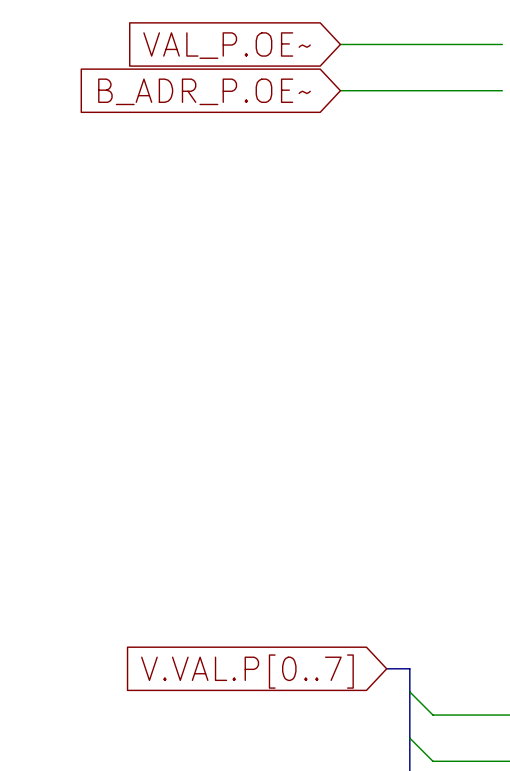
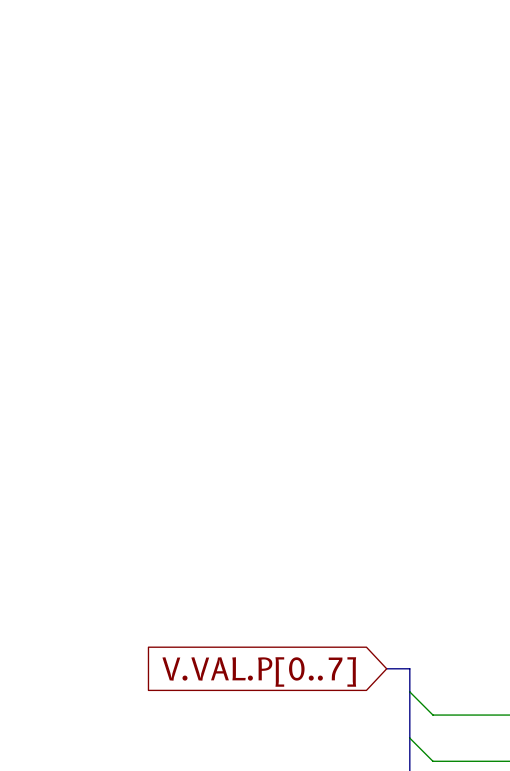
wire: (340, 44) (502, 44) -> none
global label: VAL_P.OE~ (227, 45) -> none
wire: (340, 90) (502, 90) -> none
global label: B_ADR_P.OE~ (204, 91) -> none

